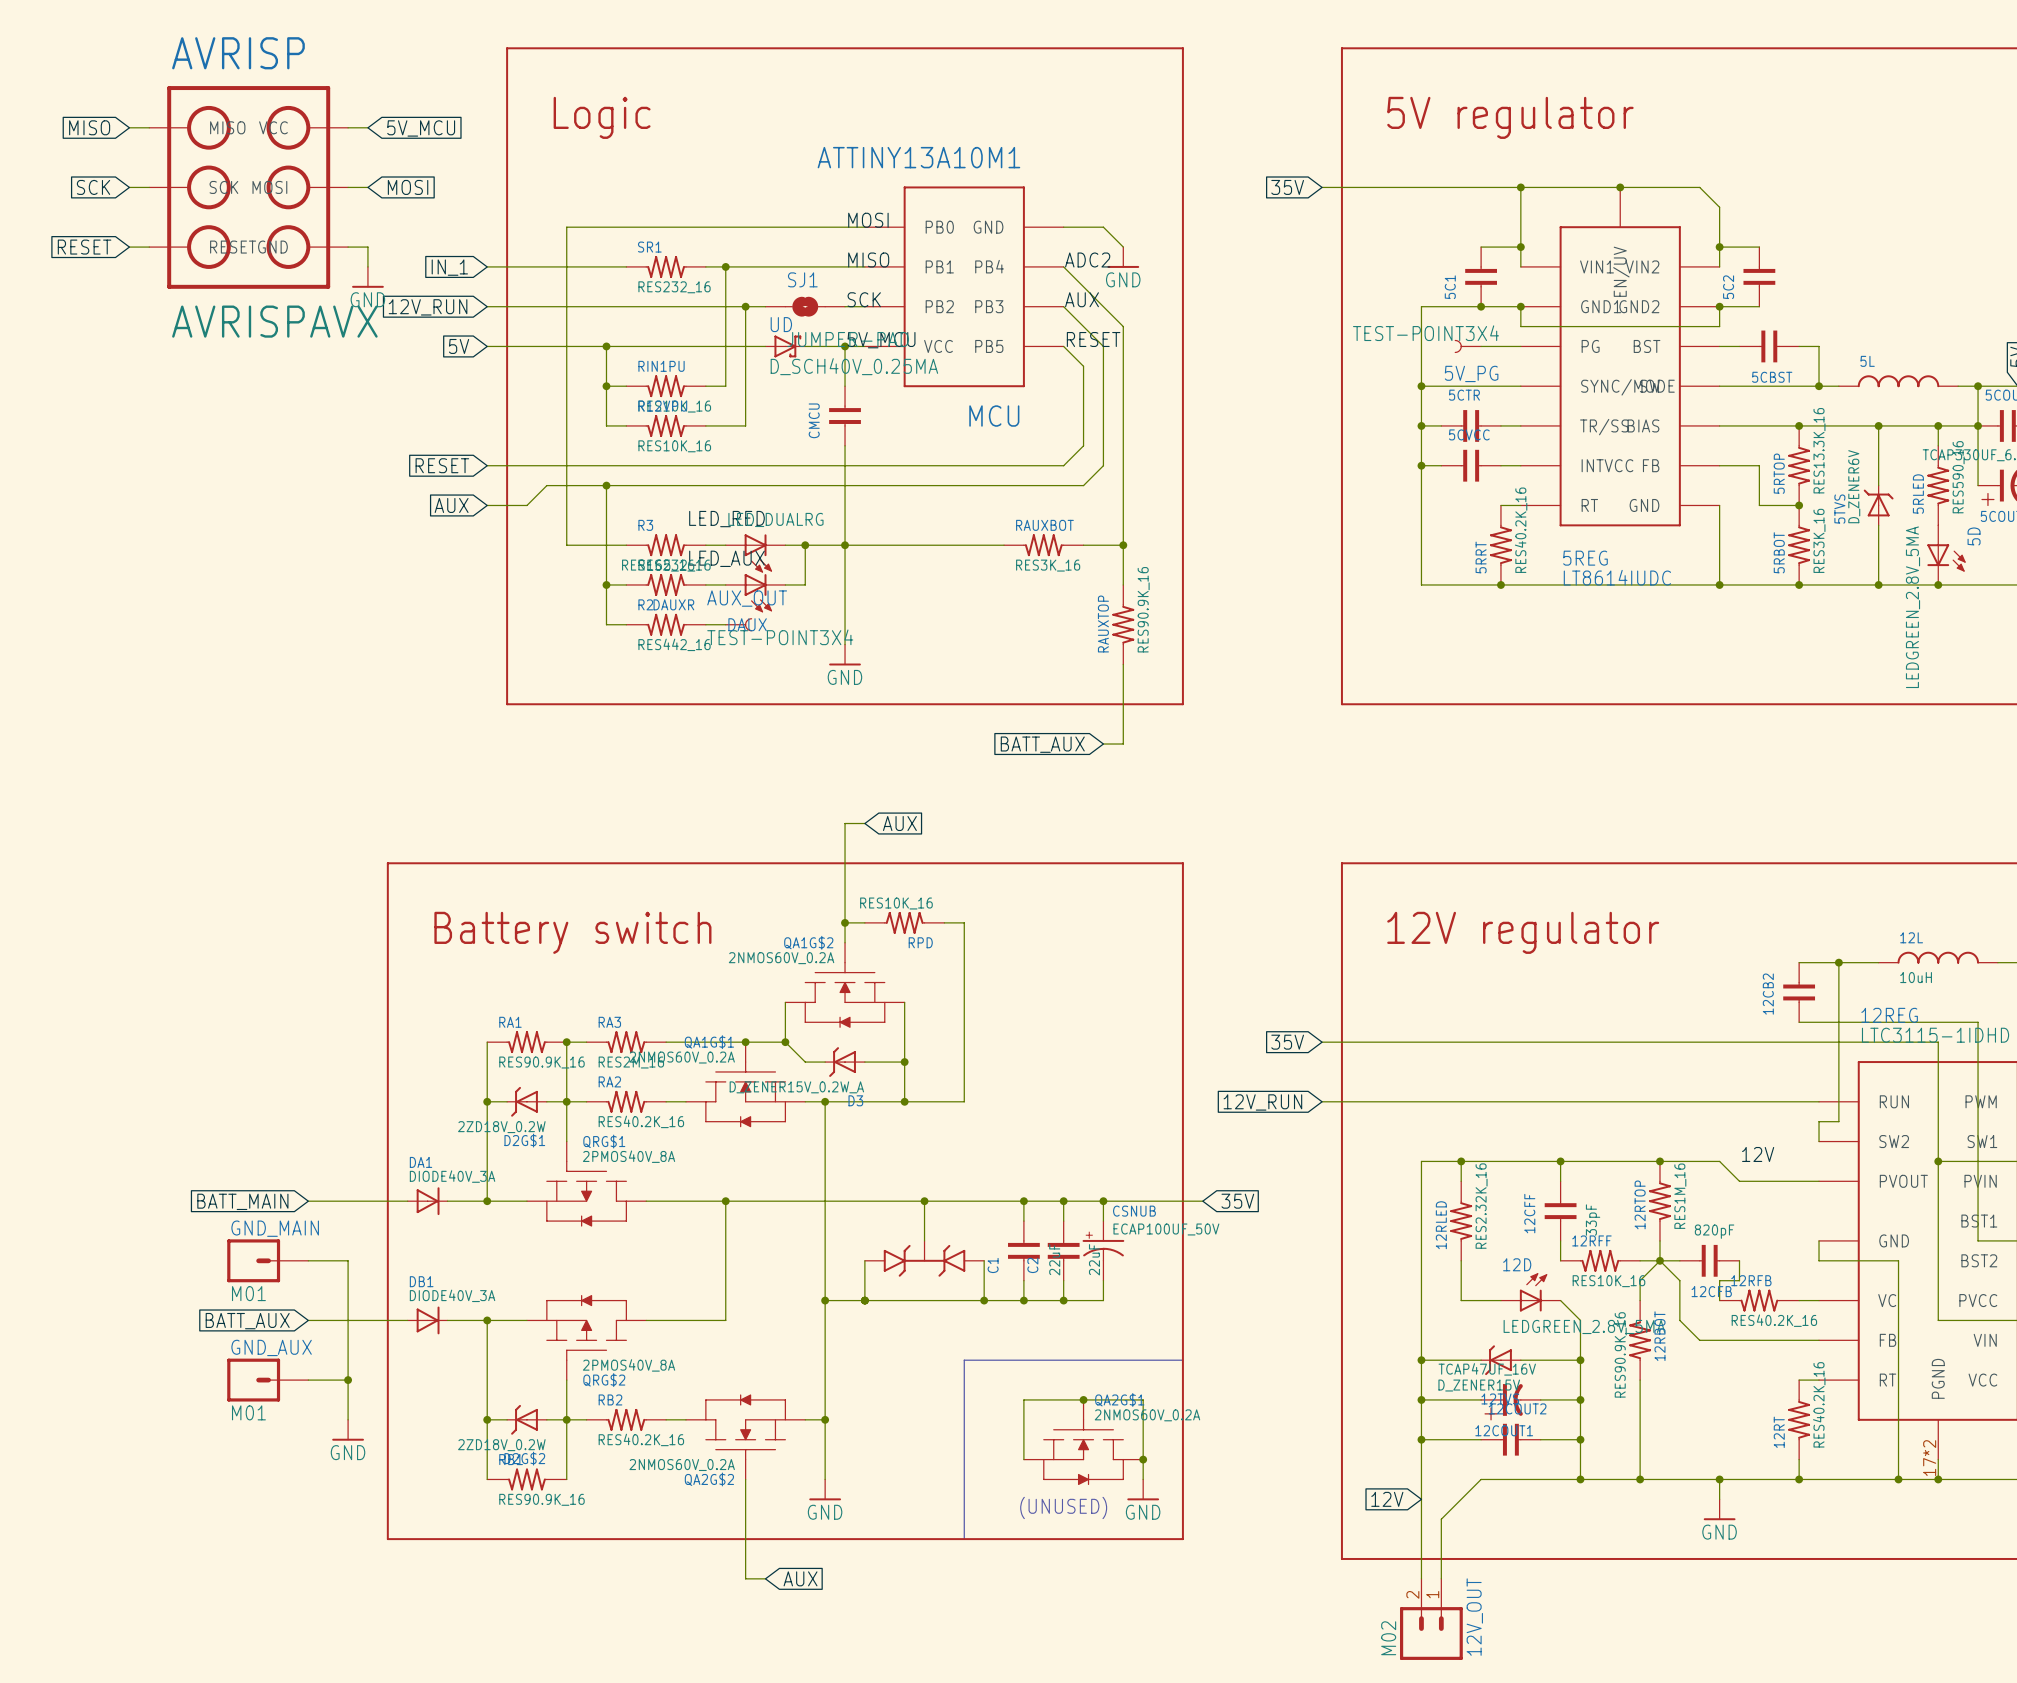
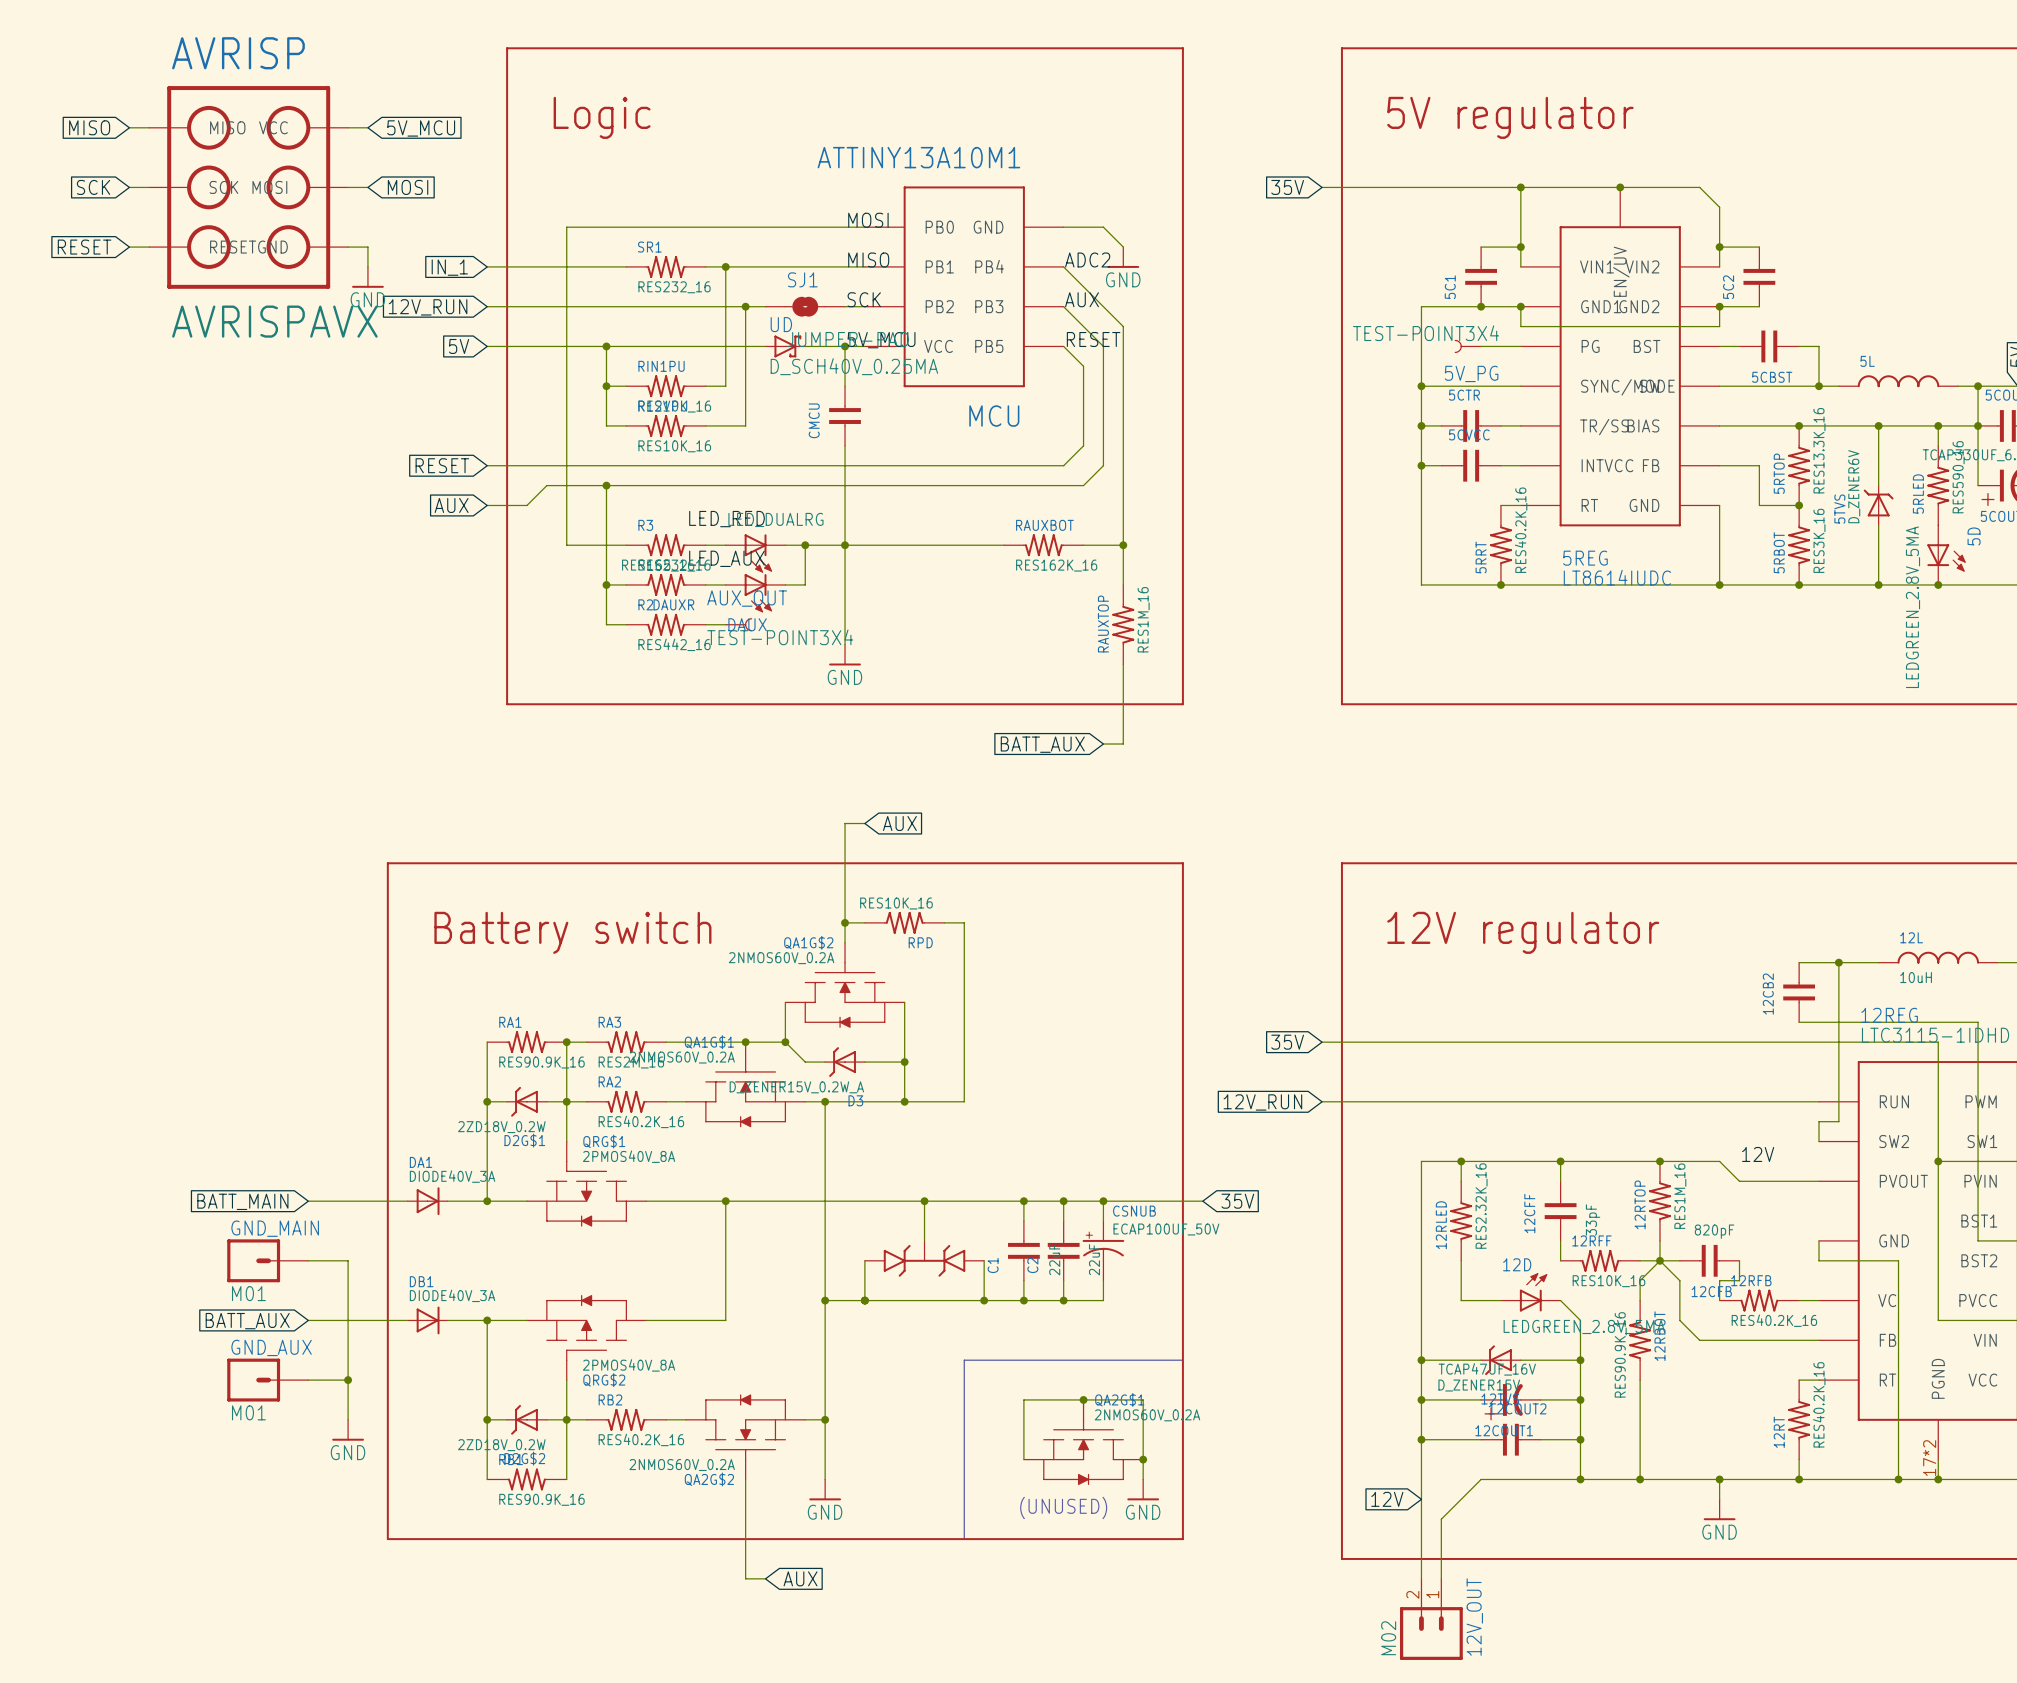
RAUXBOT value: RES3K_16 (1048, 565) -> RES162K_16 (1056, 565)
RAUXTOP value: RES90.9K_16 (1143, 609) -> RES1M_16 (1143, 619)

